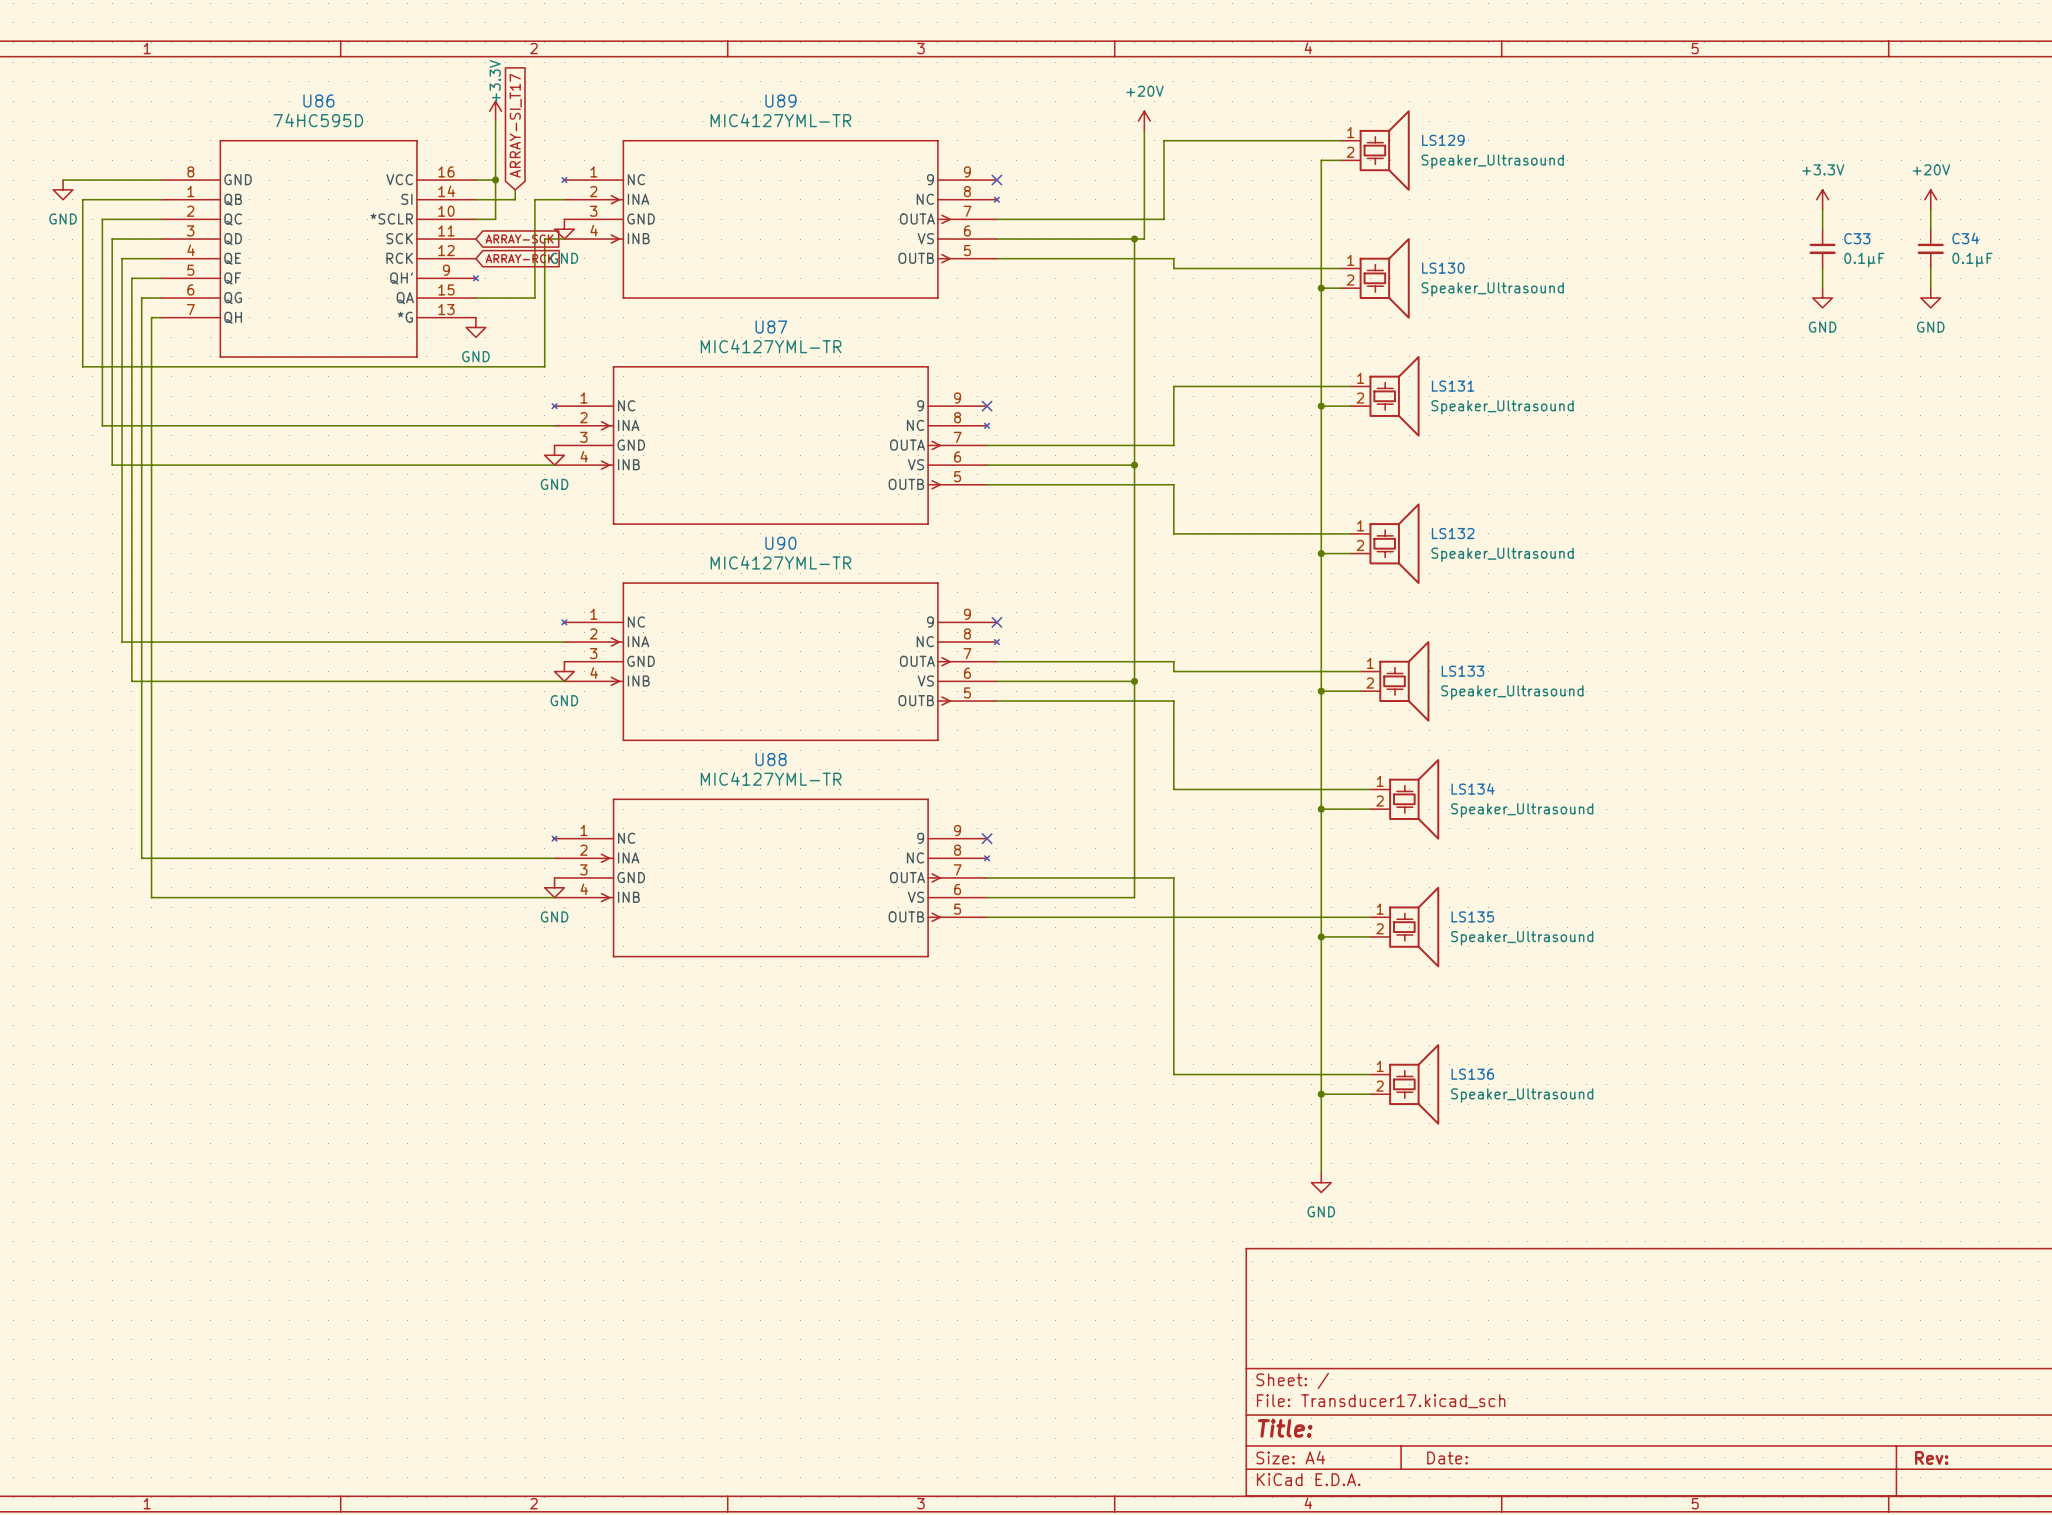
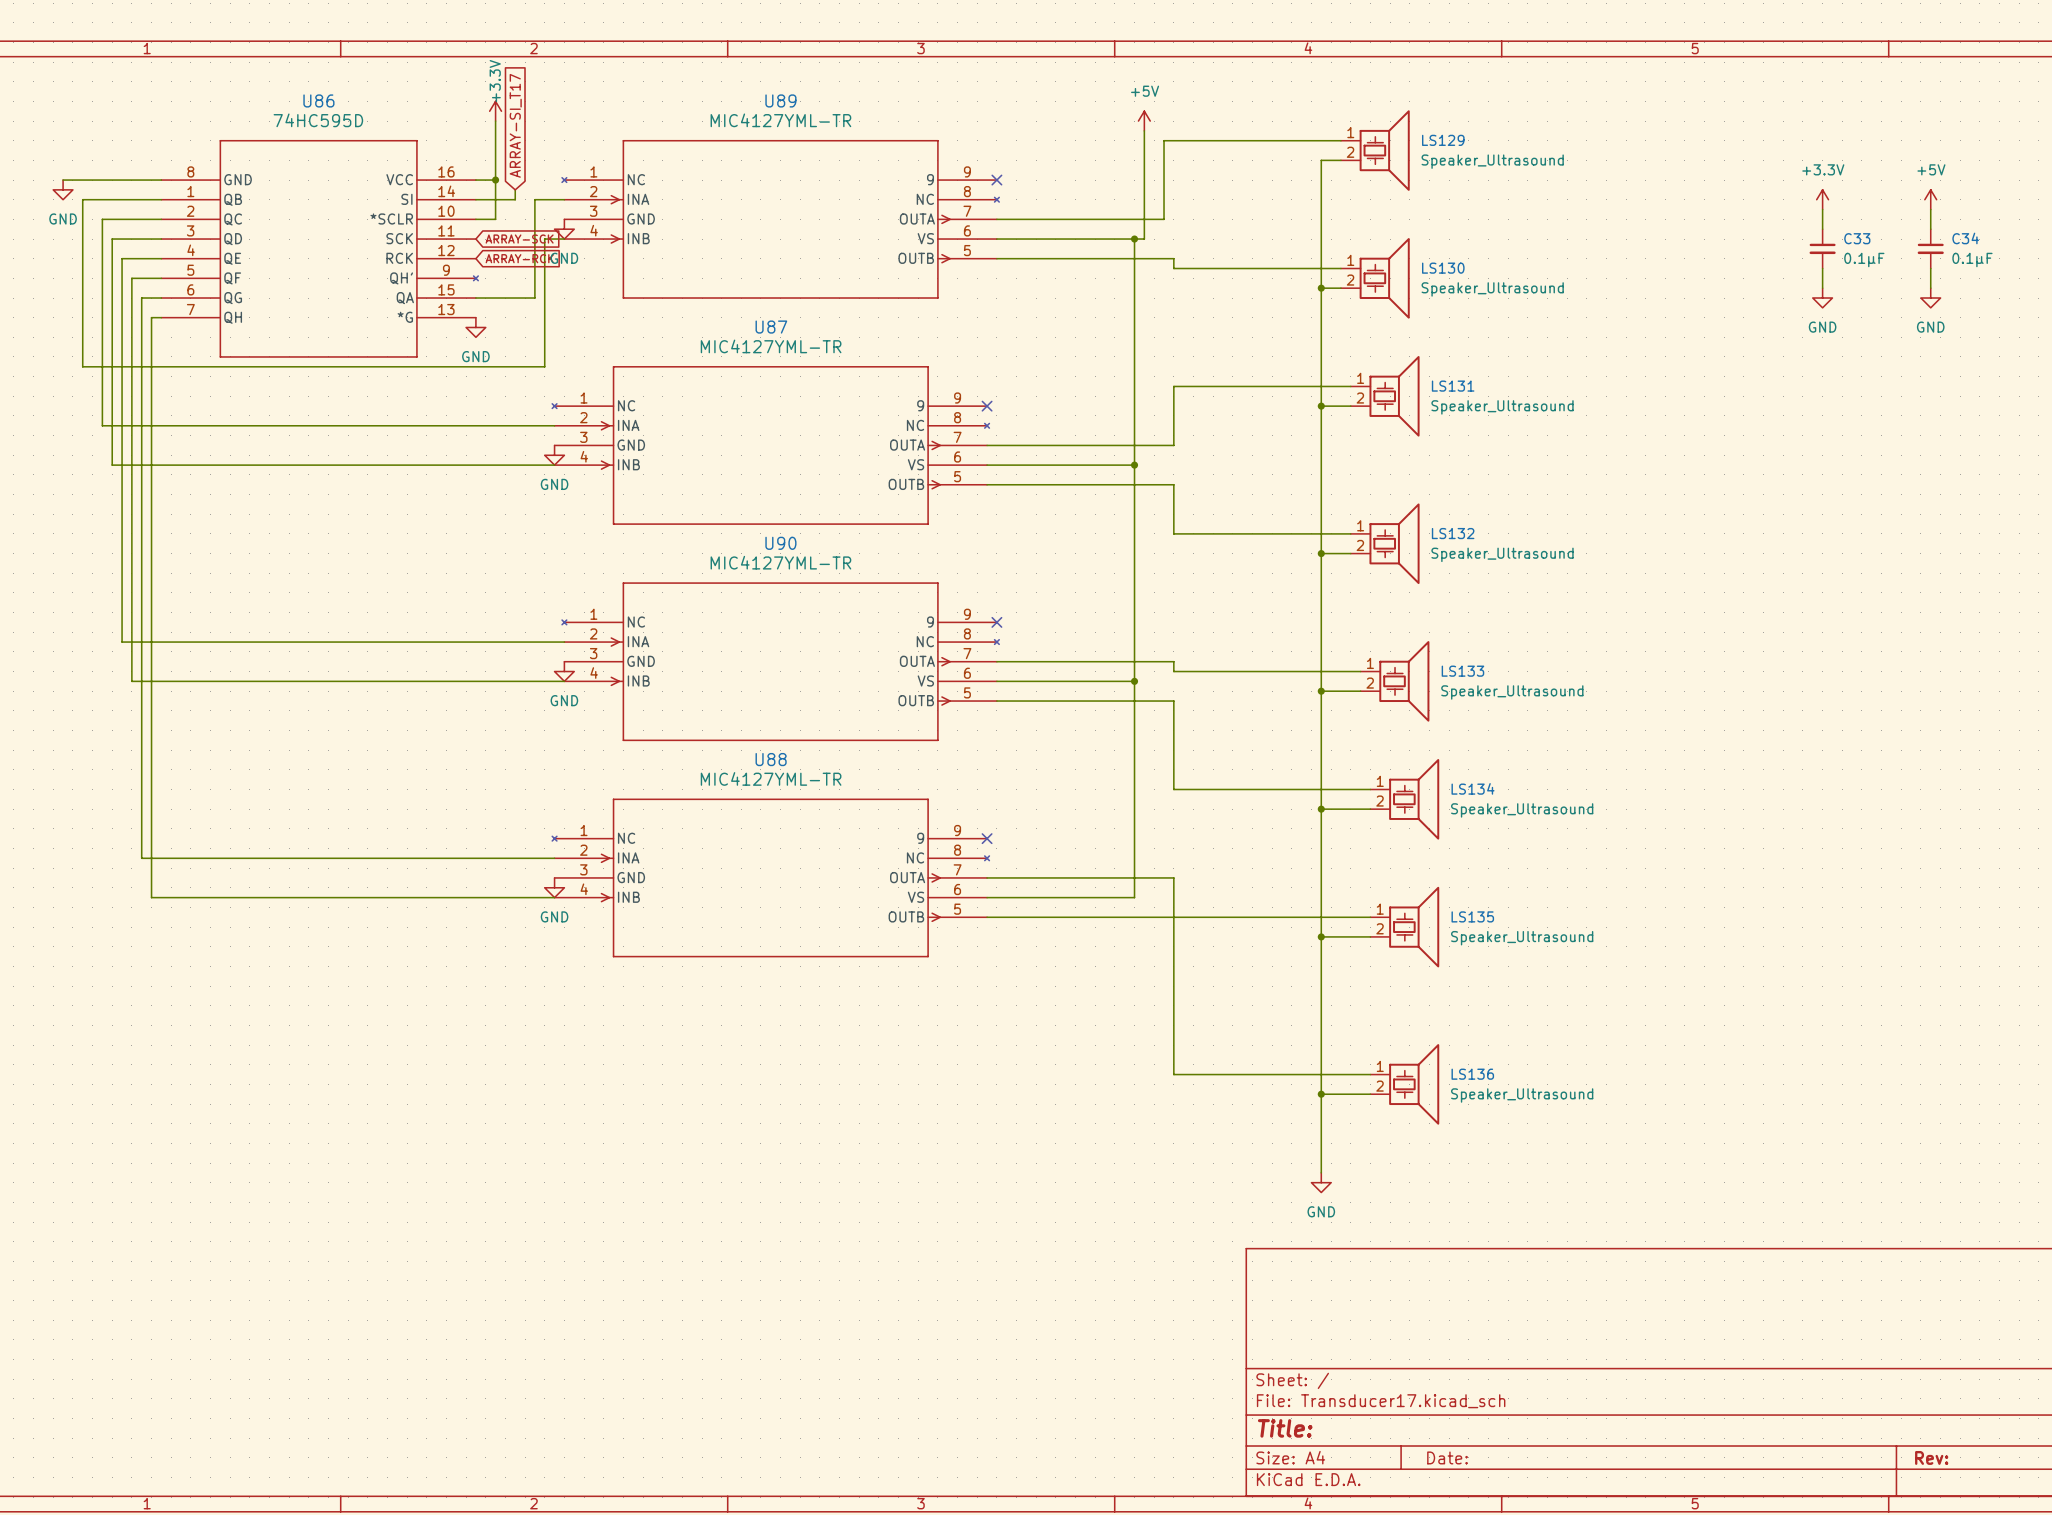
power symbol: +20V (1144, 121) -> +5V (1144, 121)
power symbol: +20V (1930, 199) -> +5V (1930, 199)

